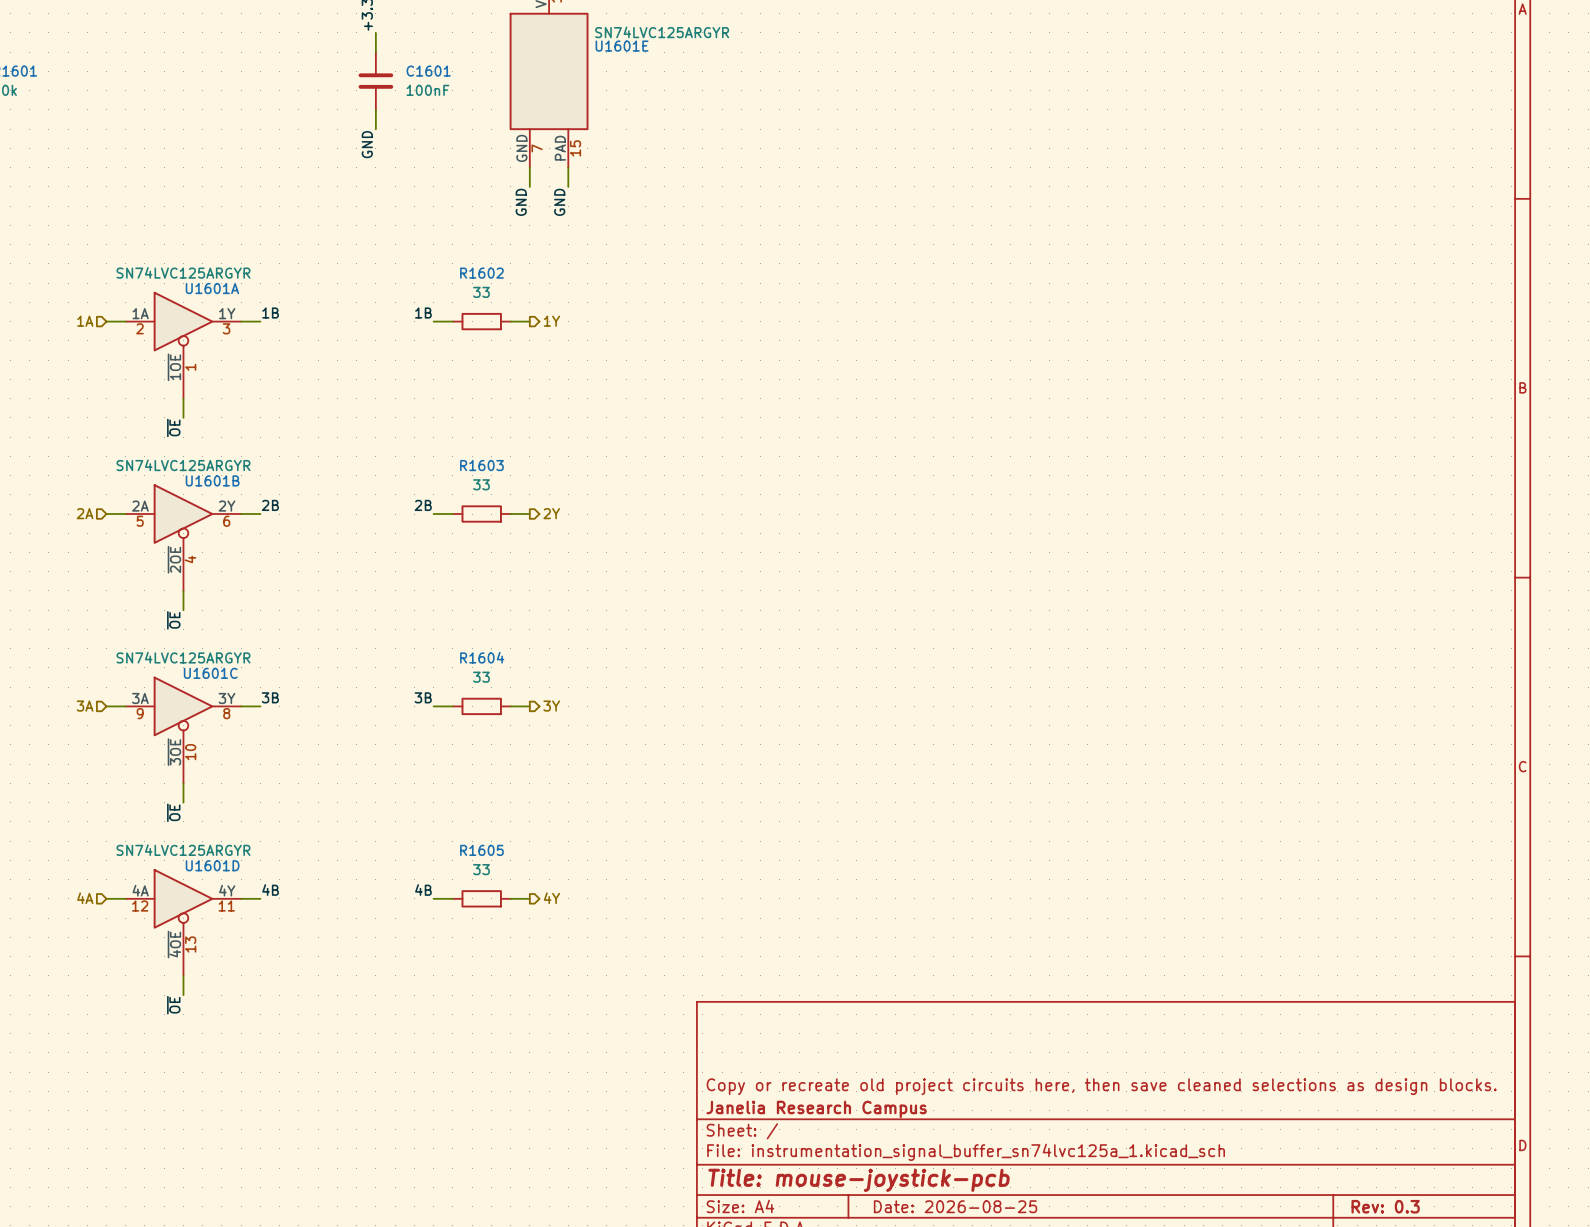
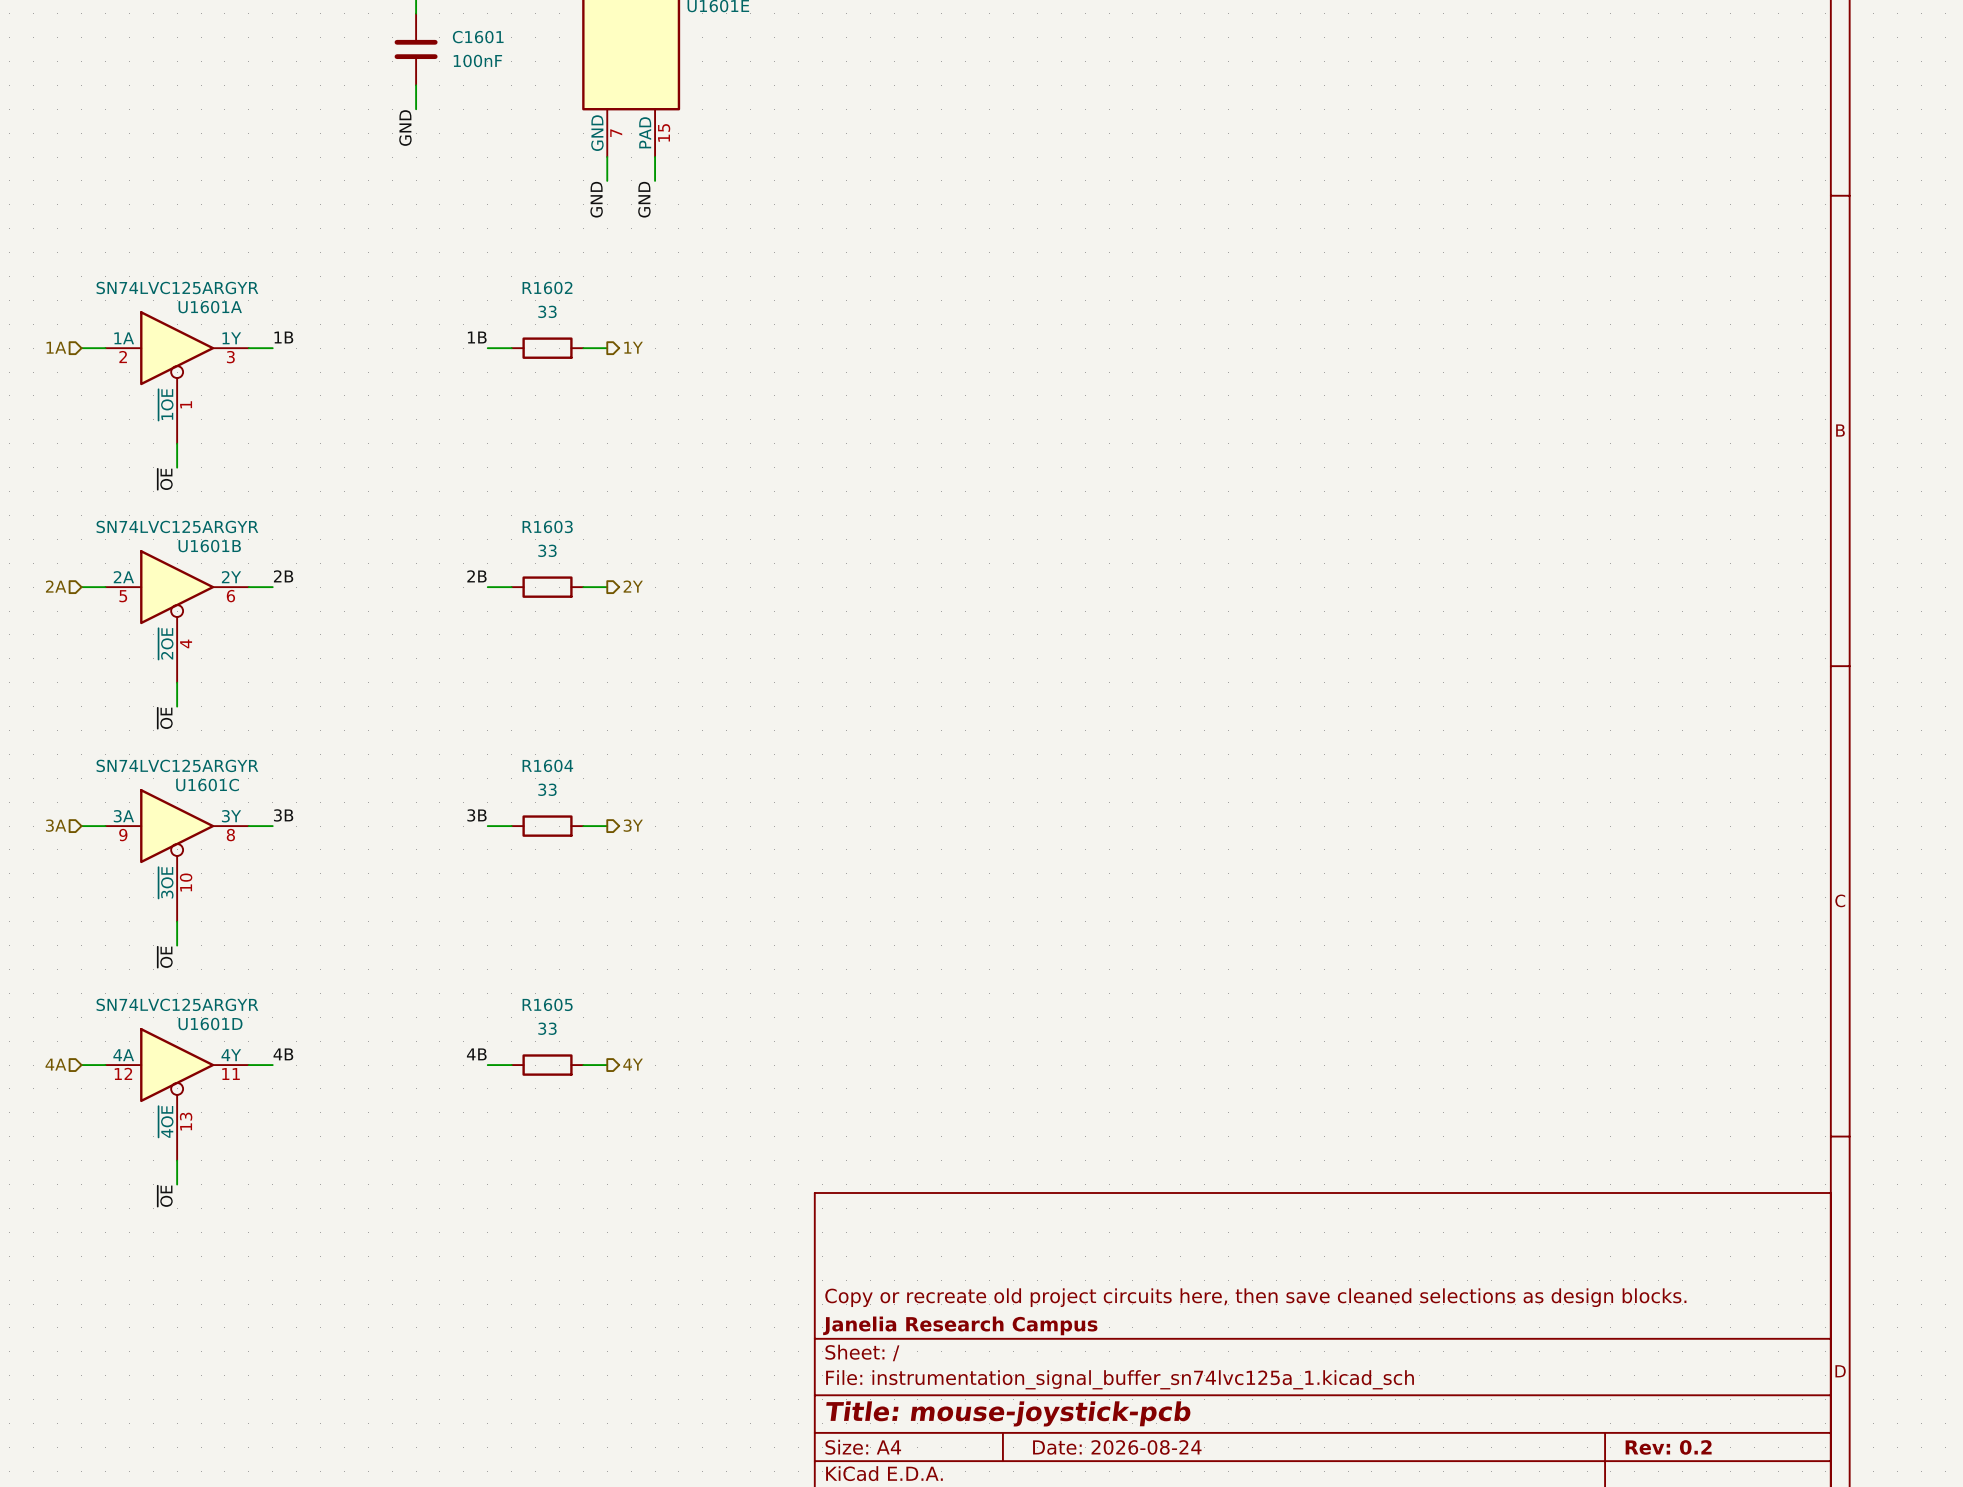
title block: Date: 2026-08-25 (955, 1206) -> Date: 2026-08-24 (1117, 1447)
title block: Rev: 0.3 (1385, 1206) -> Rev: 0.2 (1668, 1447)

